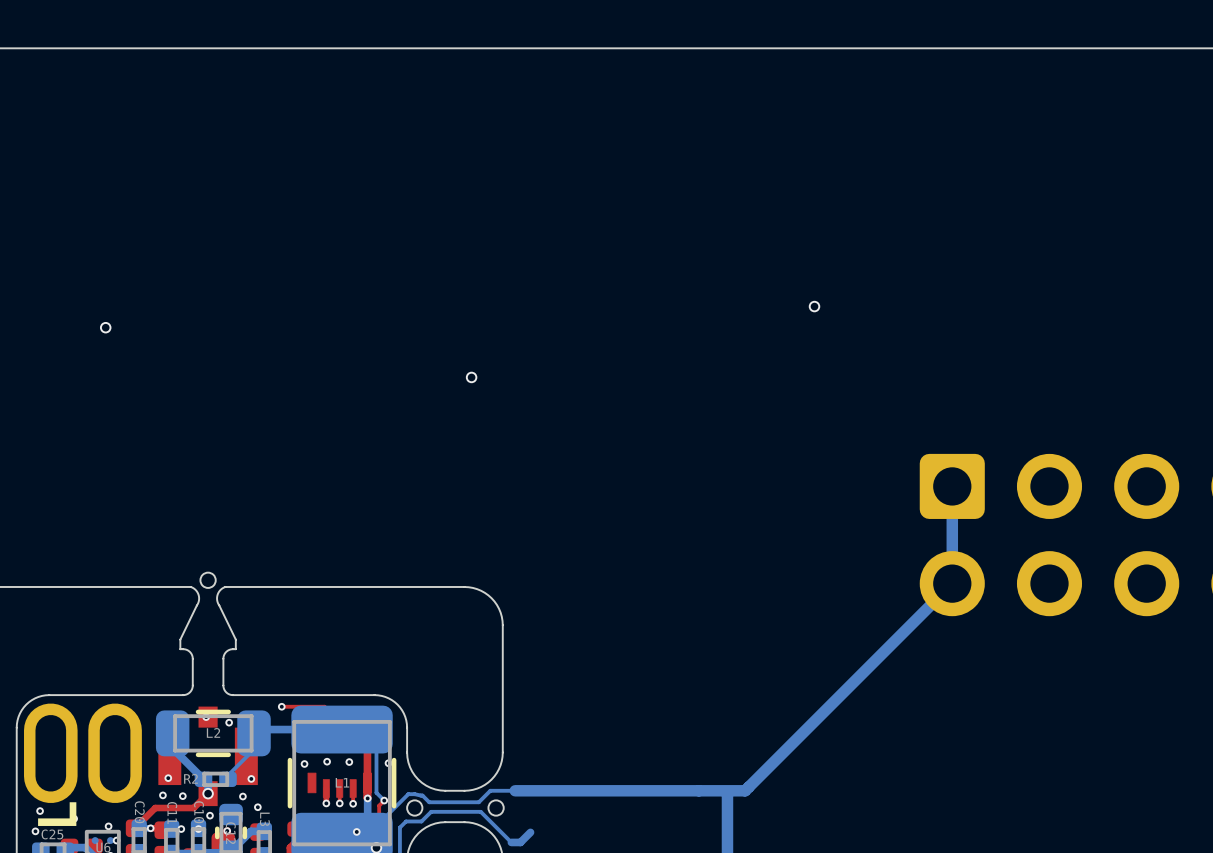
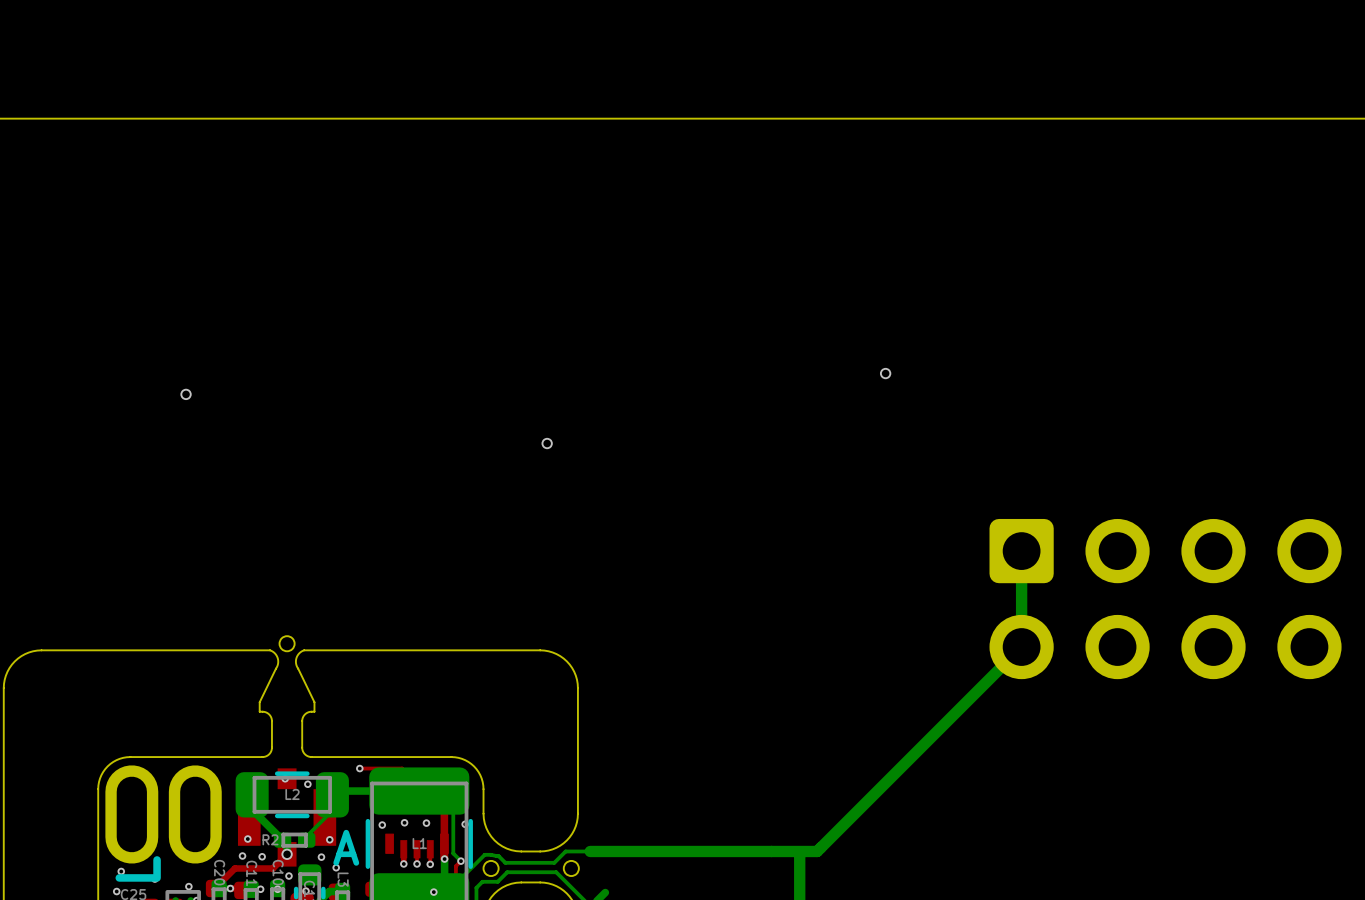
text: none -> A (346, 847)

